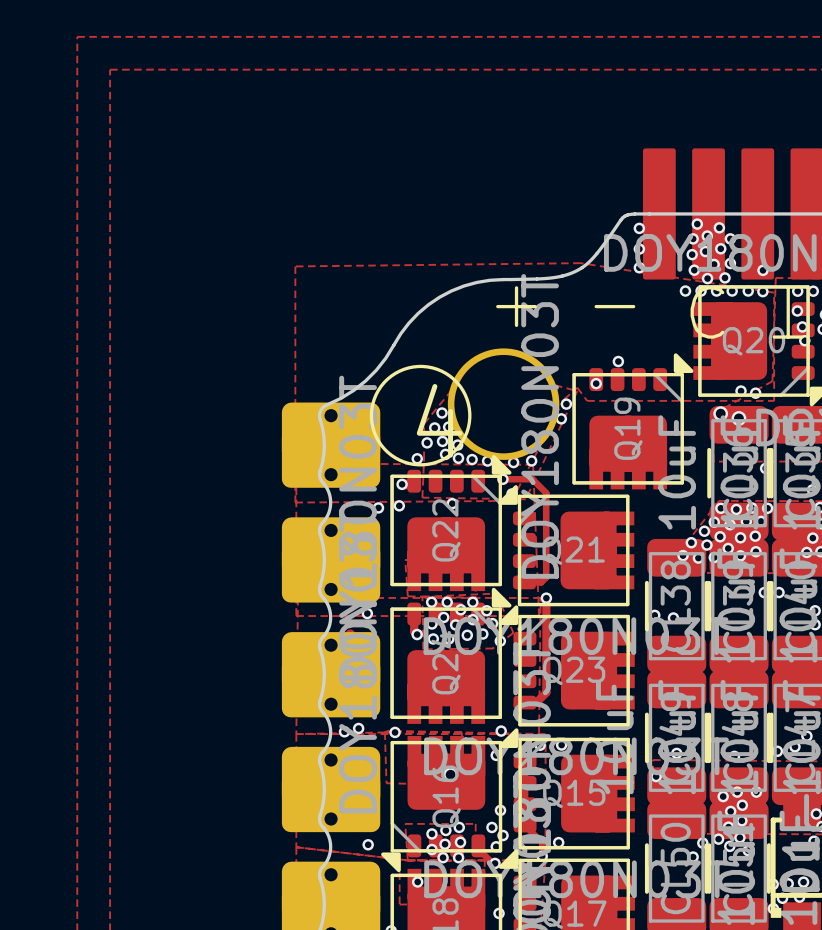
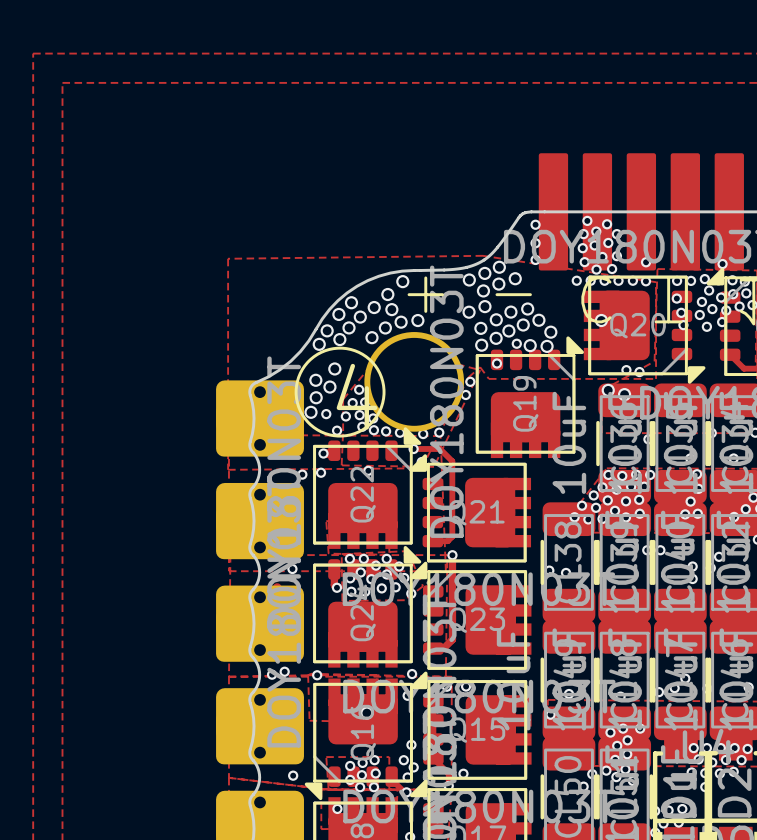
via: none -> (499, 267)
via: none -> (484, 273)
via: none -> (515, 278)
via: none -> (469, 280)
via: none -> (402, 281)
via: none -> (498, 284)
via: none -> (483, 290)
via: none -> (387, 294)
via: none -> (351, 302)
via: none -> (484, 306)
via: none -> (374, 307)
via: none -> (527, 309)
via: none -> (391, 309)
via: none -> (469, 312)
via: none -> (510, 312)
via: none -> (338, 314)
via: none -> (360, 317)
via: none -> (496, 319)
via: none -> (417, 320)
via: none -> (538, 320)
via: none -> (601, 320)
via: none -> (401, 322)
via: none -> (523, 325)
via: none -> (349, 327)
via: none -> (385, 327)
via: none -> (480, 328)
via: none -> (327, 330)
via: none -> (508, 331)
via: none -> (550, 332)
via: none -> (371, 337)
via: none -> (496, 338)
via: none -> (339, 339)
via: none -> (319, 344)
via: none -> (481, 345)
via: none -> (530, 345)
via: none -> (547, 346)
via: none -> (334, 368)
via: none -> (315, 380)
via: none -> (329, 387)
via: none -> (316, 397)
via: none -> (311, 412)
via: none -> (326, 414)

